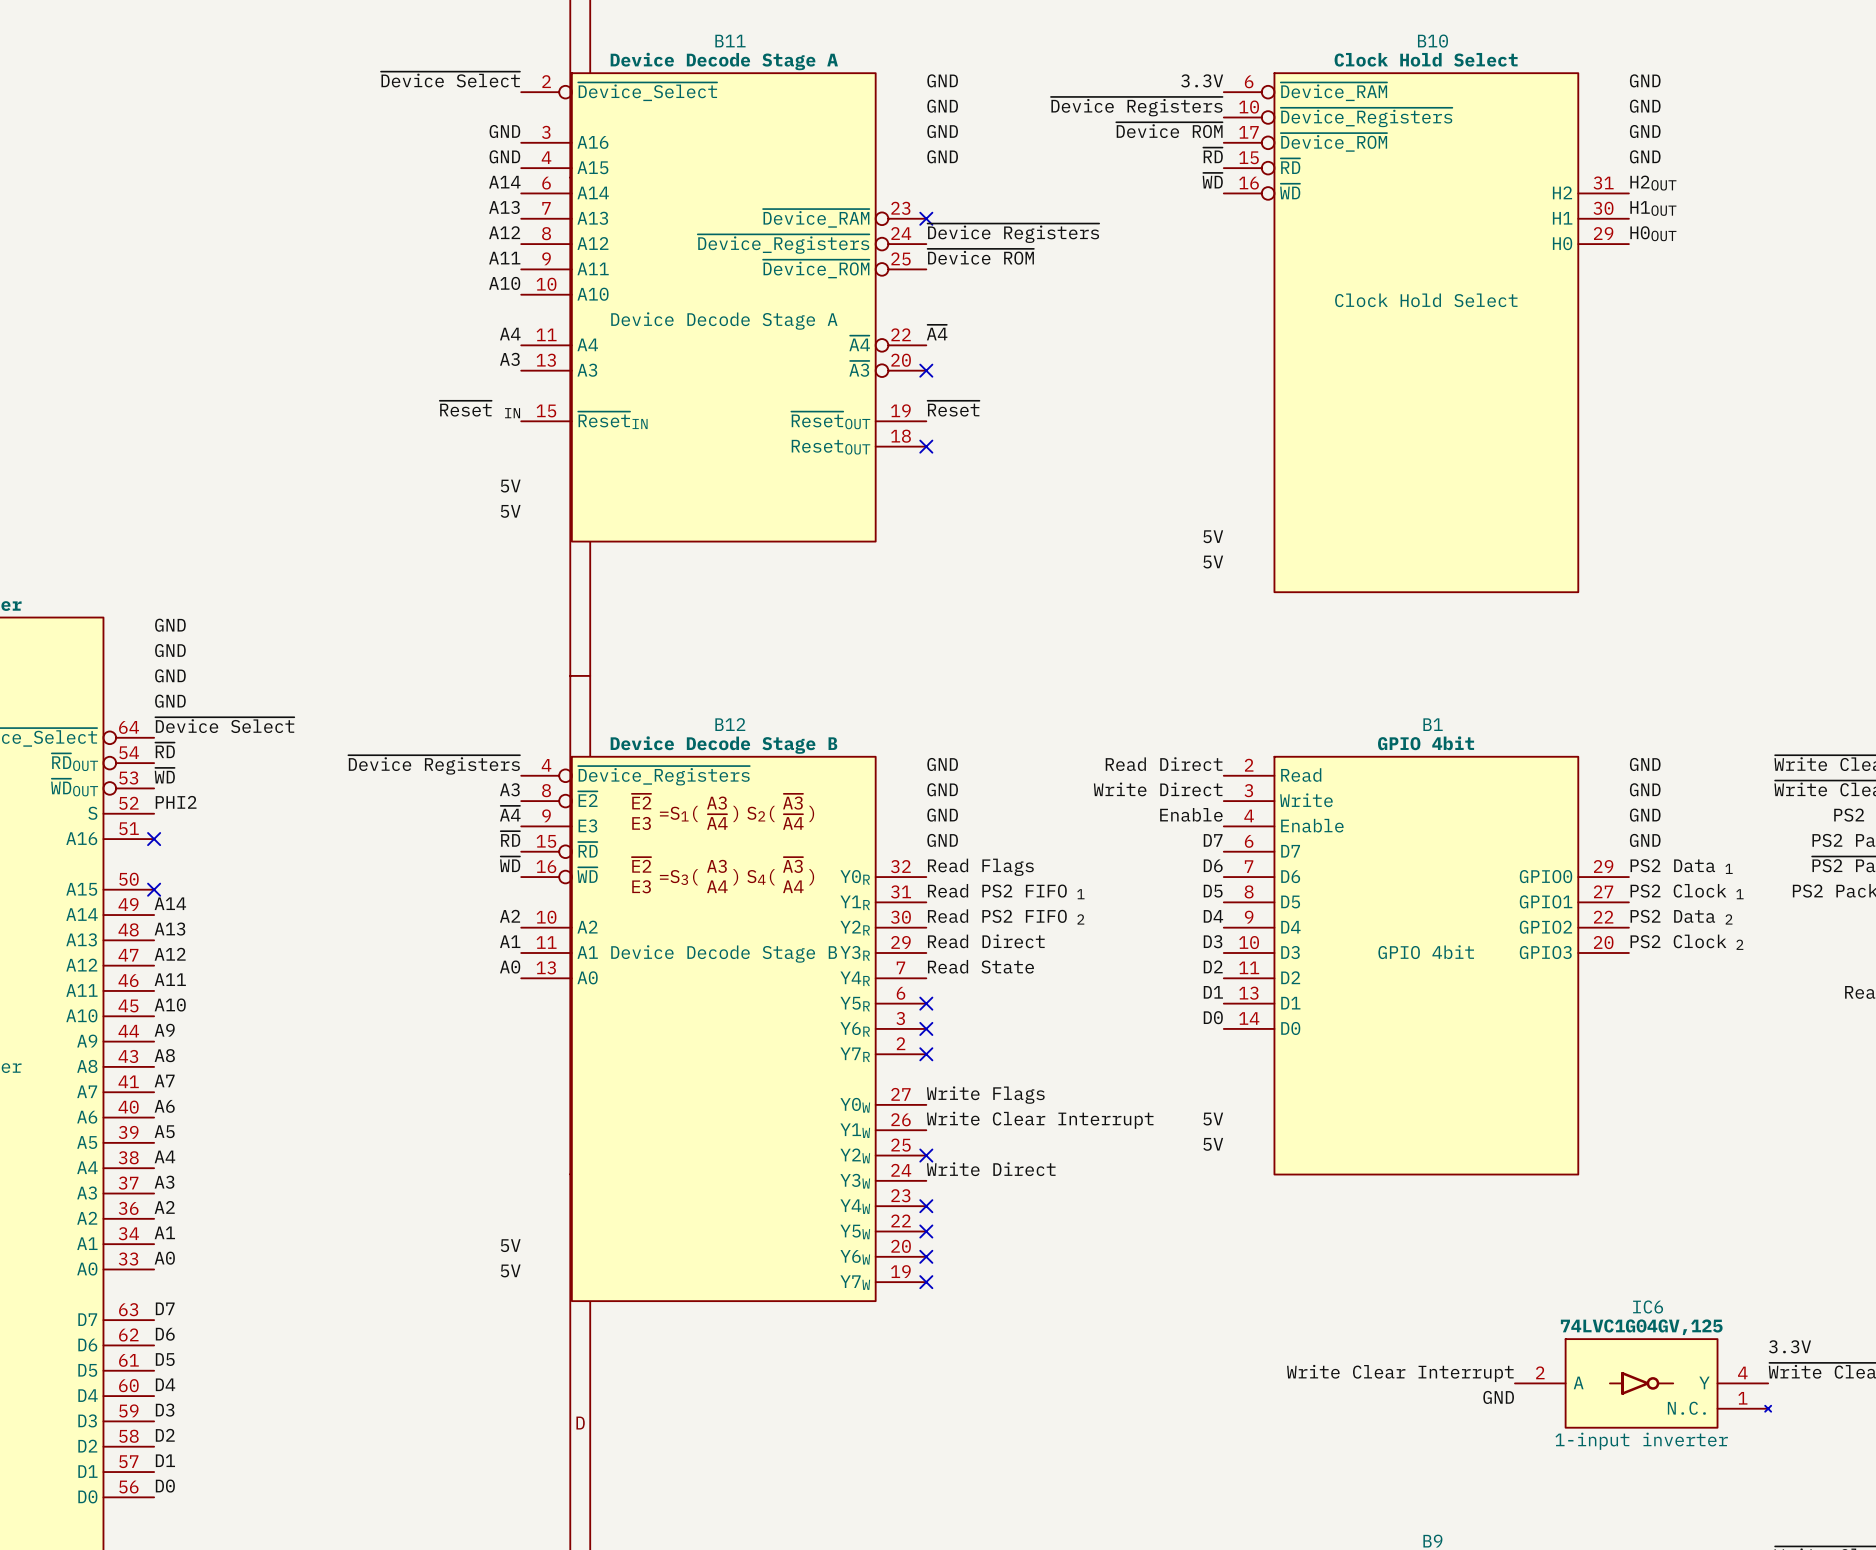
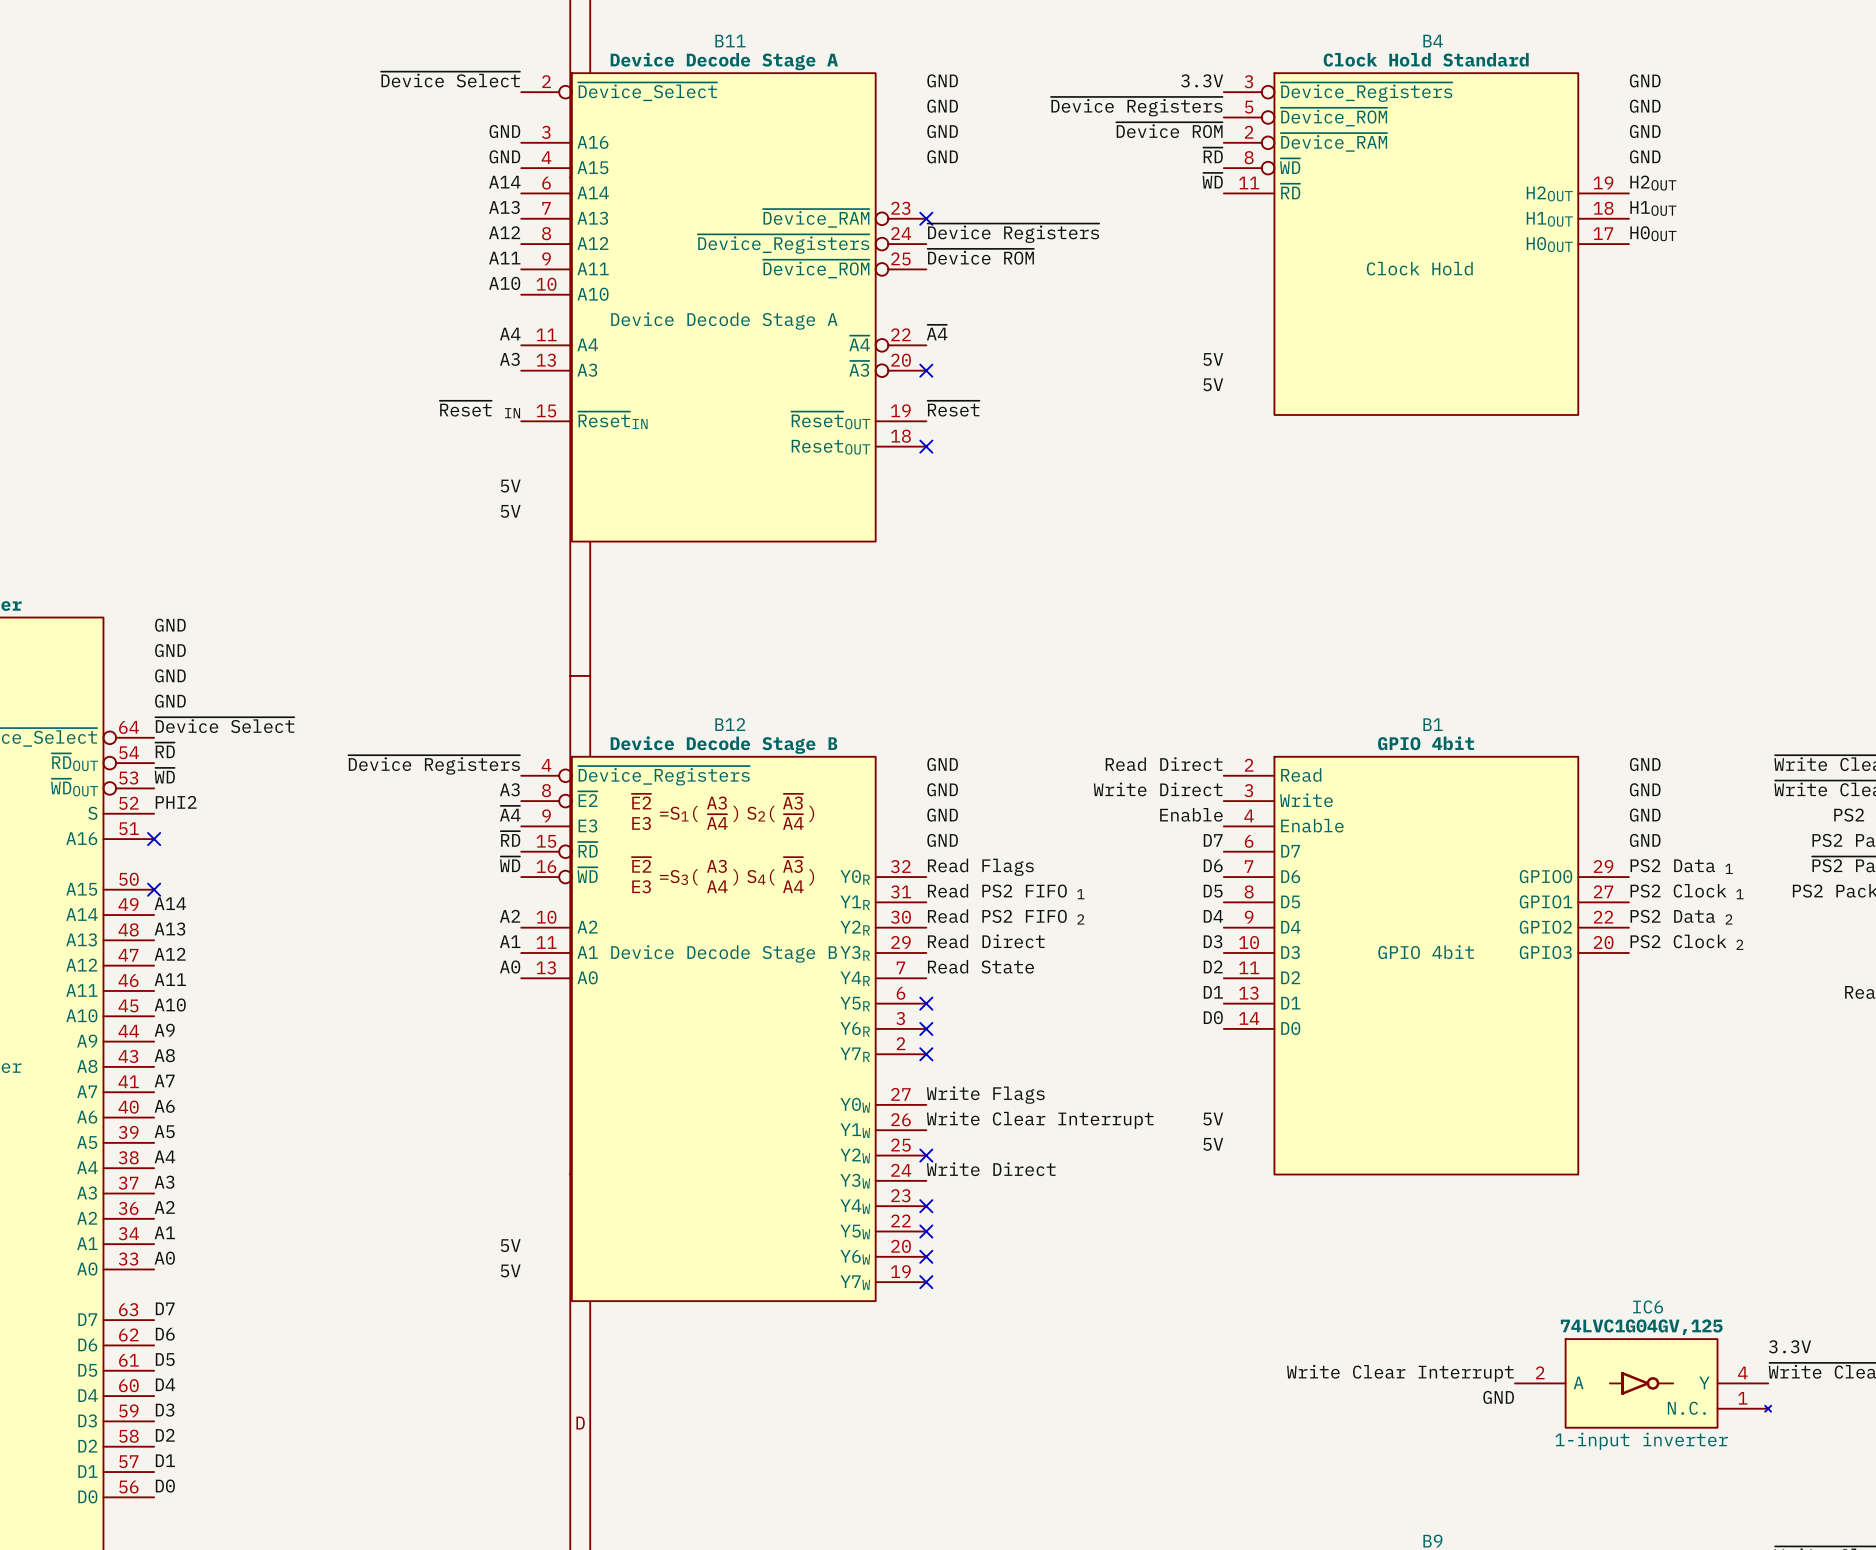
B4: none -> Clock Hold Standard (1426, 244)
B10: Clock Hold Select (1426, 332) -> none
label: none -> 5V (1213, 359)
label: none -> 5V (1213, 384)
label: 5V (1213, 536) -> none
label: 5V (1213, 562) -> none

